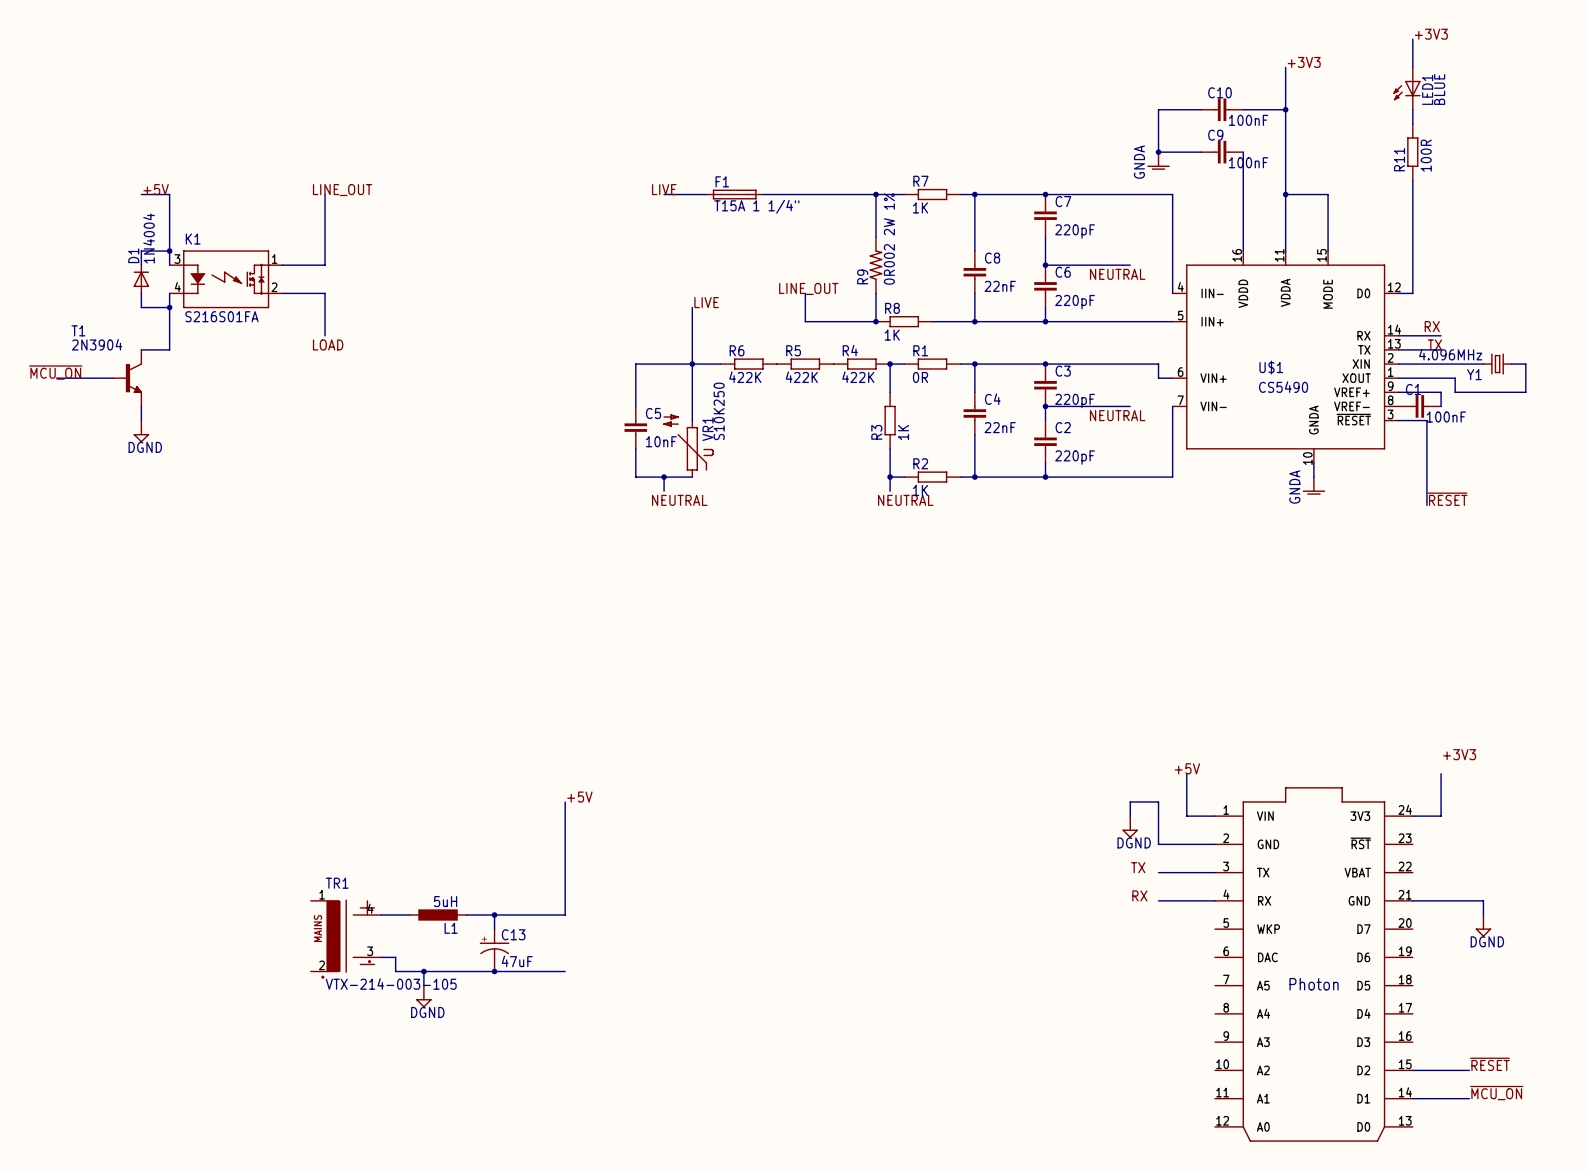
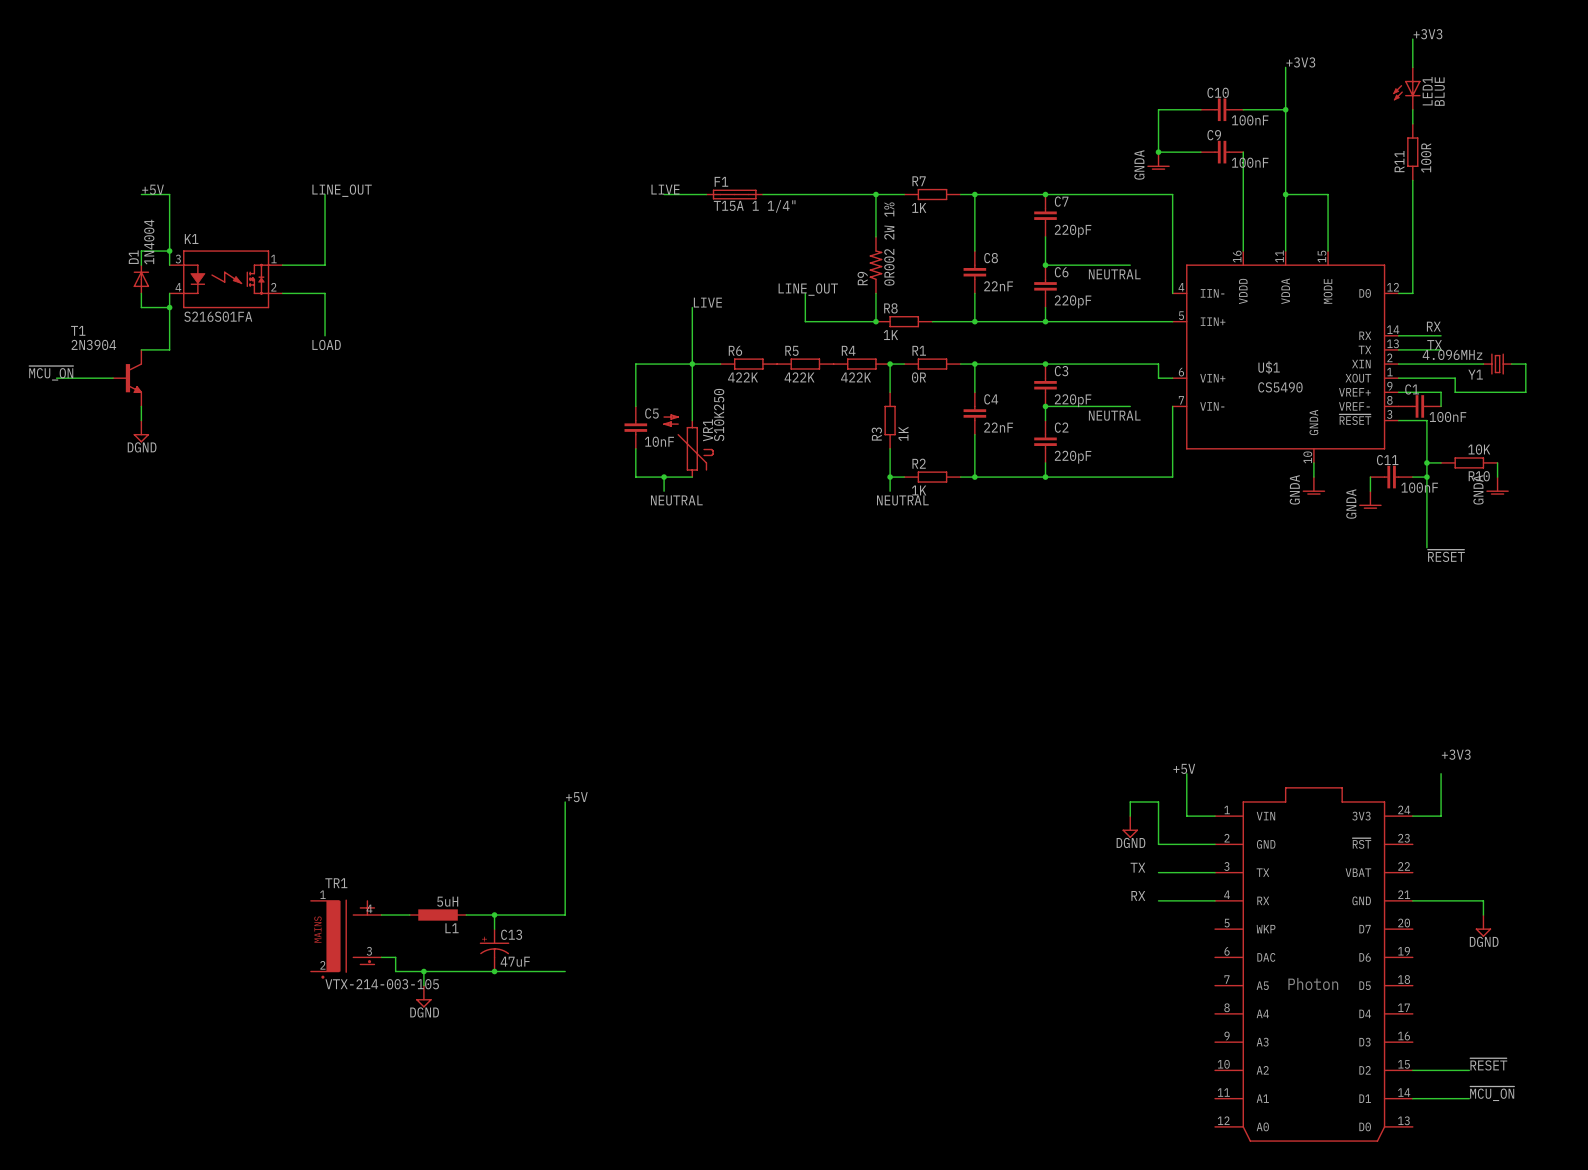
wire: none -> (1426, 462) (1441, 462)
junction: none -> (1426, 462)
R10: none -> 10K (1469, 462)
wire: none -> (1497, 462) (1497, 477)
wire: none -> (1370, 477) (1370, 491)
C11: none -> 100nF (1391, 477)
wire: none -> (1412, 477) (1426, 477)
junction: none -> (1426, 477)
power symbol: none -> GNDA (1497, 485)
label position: ~{RESET} (1447, 499) -> ~{RESET} (1446, 555)
power symbol: none -> GNDA (1370, 500)
wire: none -> (1426, 505) (1426, 547)

